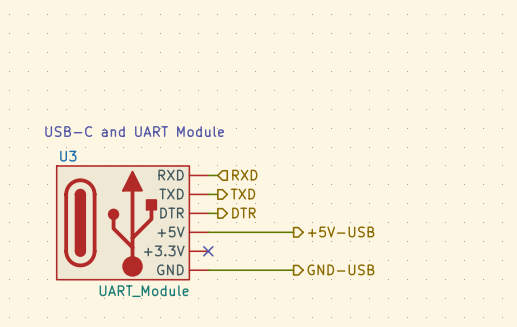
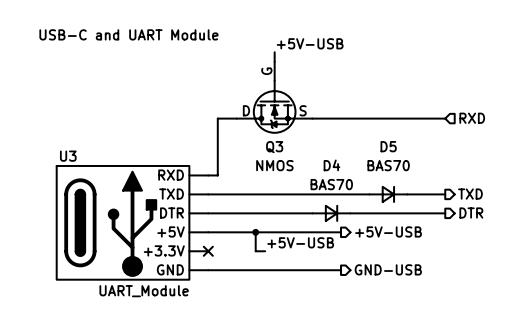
label: none -> +5V-USB (310, 43)
wire: none -> (274, 52) (274, 61)
Q3: none -> NMOS (274, 97)
wire: none -> (236, 118) (217, 118) (217, 175)
wire: none -> (312, 118) (445, 118)
hierarchical label: none -> RXD (472, 118)
text position: USB-C and UART Module (134, 131) -> USB-C and UART Module (128, 34)
hierarchical label: RXD (244, 175) -> none
wire: none -> (217, 194) (369, 194)
hierarchical label: TXD (242, 194) -> none
D5: none -> BAS70 (388, 194)
wire: none -> (407, 194) (445, 194)
hierarchical label: none -> TXD (470, 194)
wire: none -> (217, 213) (312, 213)
hierarchical label: DTR (243, 213) -> none
D4: none -> BAS70 (331, 213)
wire: none -> (350, 213) (445, 213)
hierarchical label: none -> DTR (471, 213)
hierarchical label position: +5V-USB (341, 231) -> +5V-USB (388, 231)
wire: none -> (255, 232) (255, 251) (265, 251)
junction: none -> (255, 232)
wire: none -> (293, 232) (341, 232)
label: none -> +5V-USB (300, 242)
hierarchical label position: GND-USB (340, 269) -> GND-USB (388, 269)
wire: none -> (293, 270) (341, 270)

